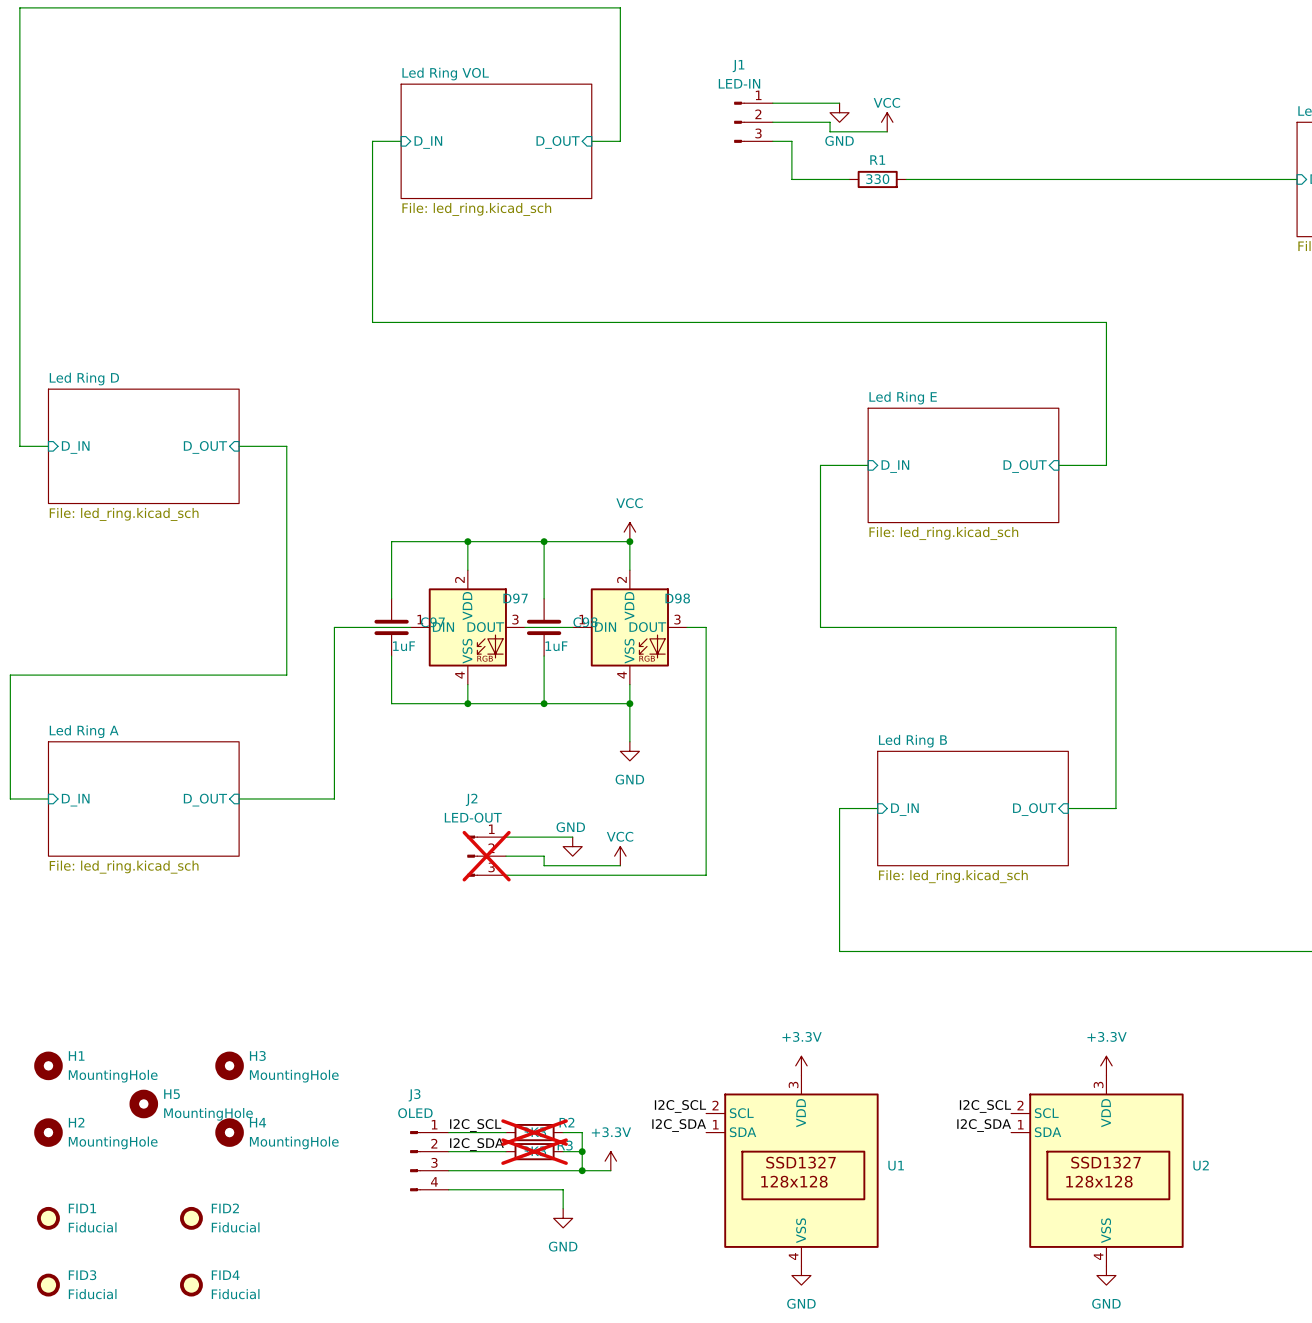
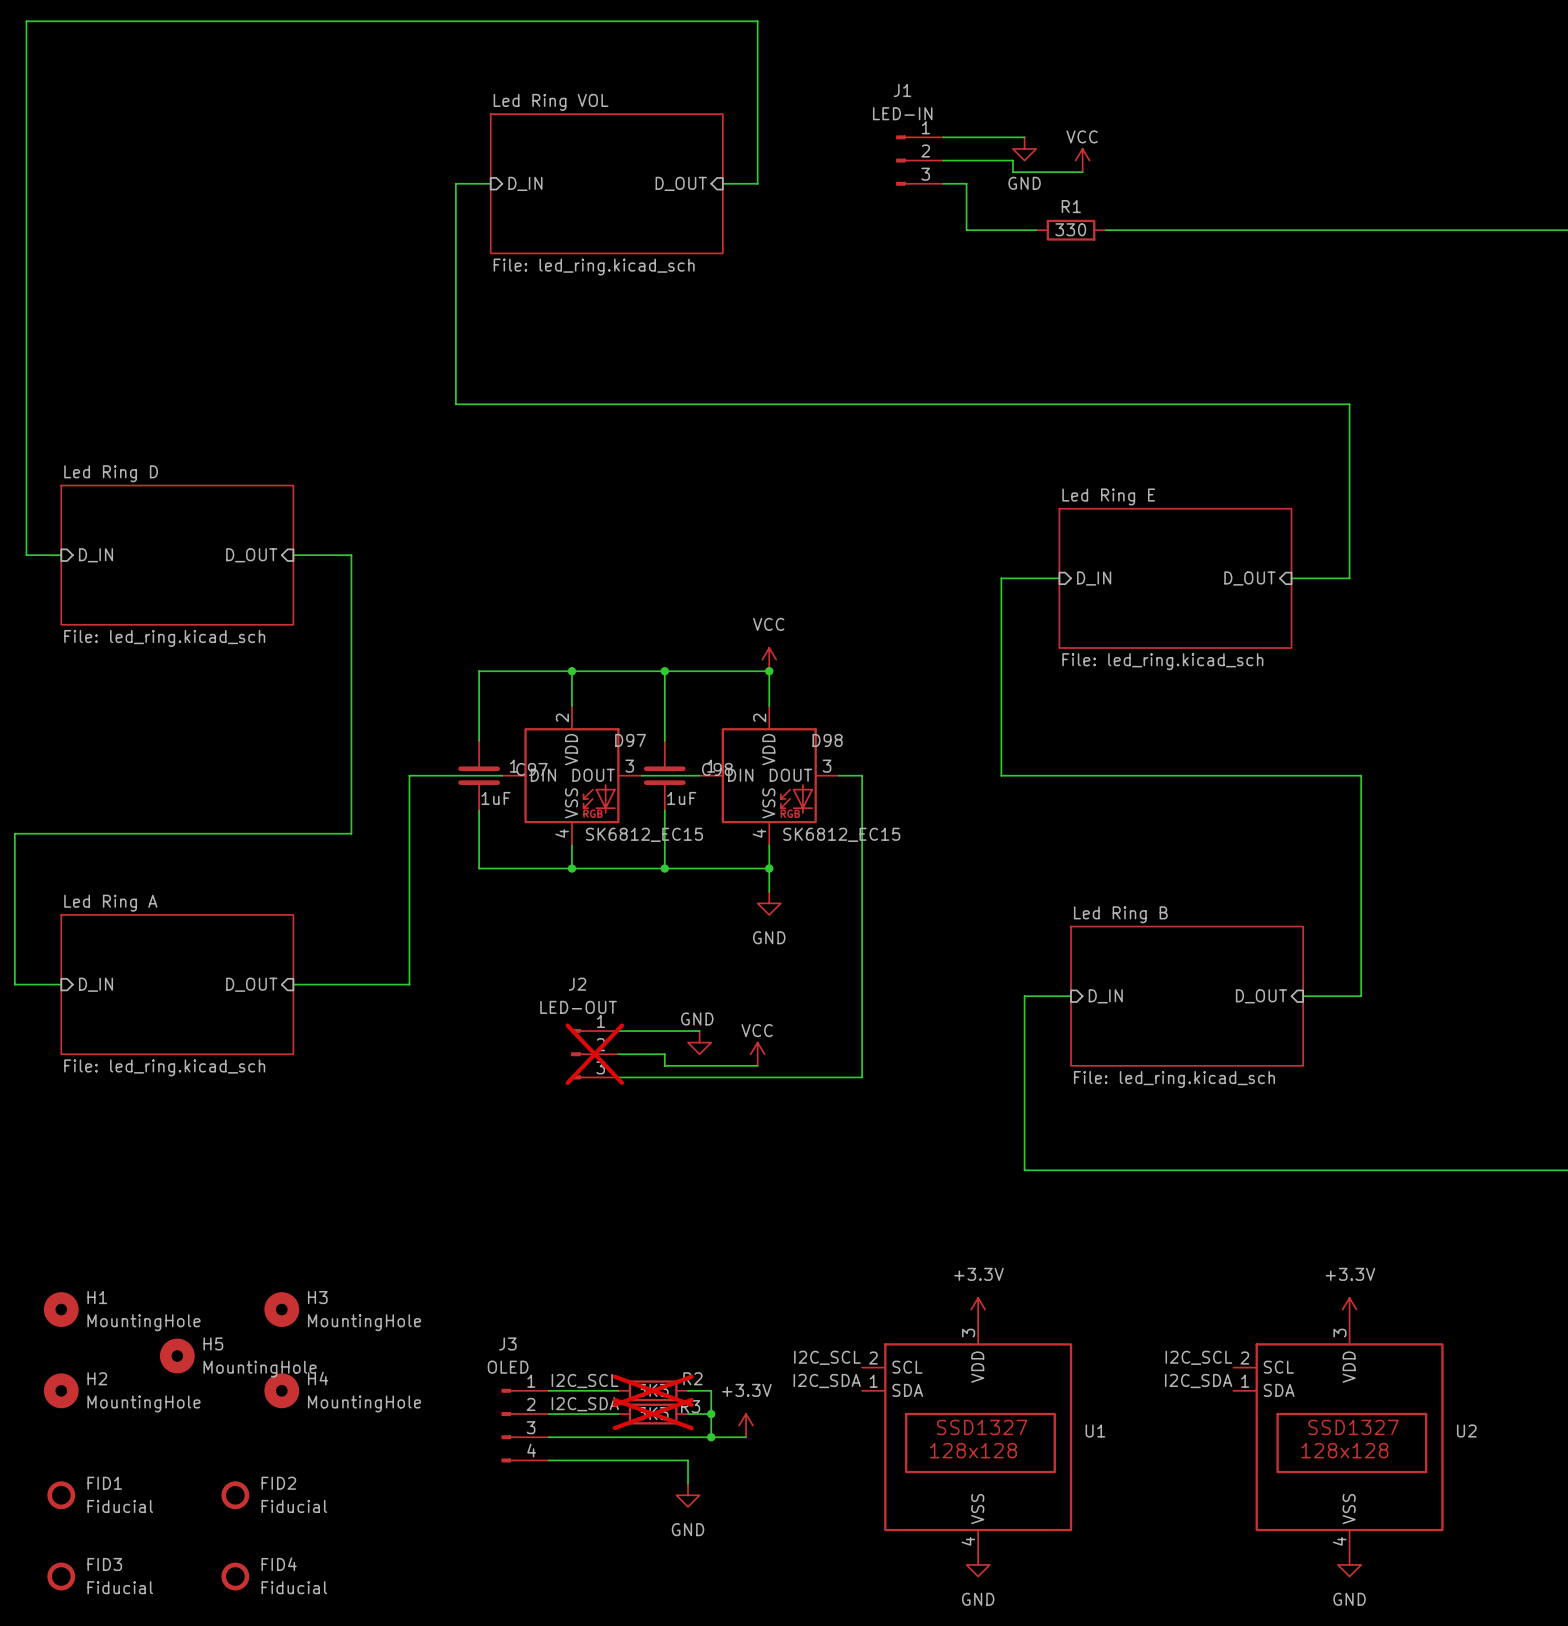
D97 value: none -> SK6812_EC15 (644, 834)
D98 value: none -> SK6812_EC15 (841, 834)
power symbol position: GND (629, 751) -> GND (769, 903)

